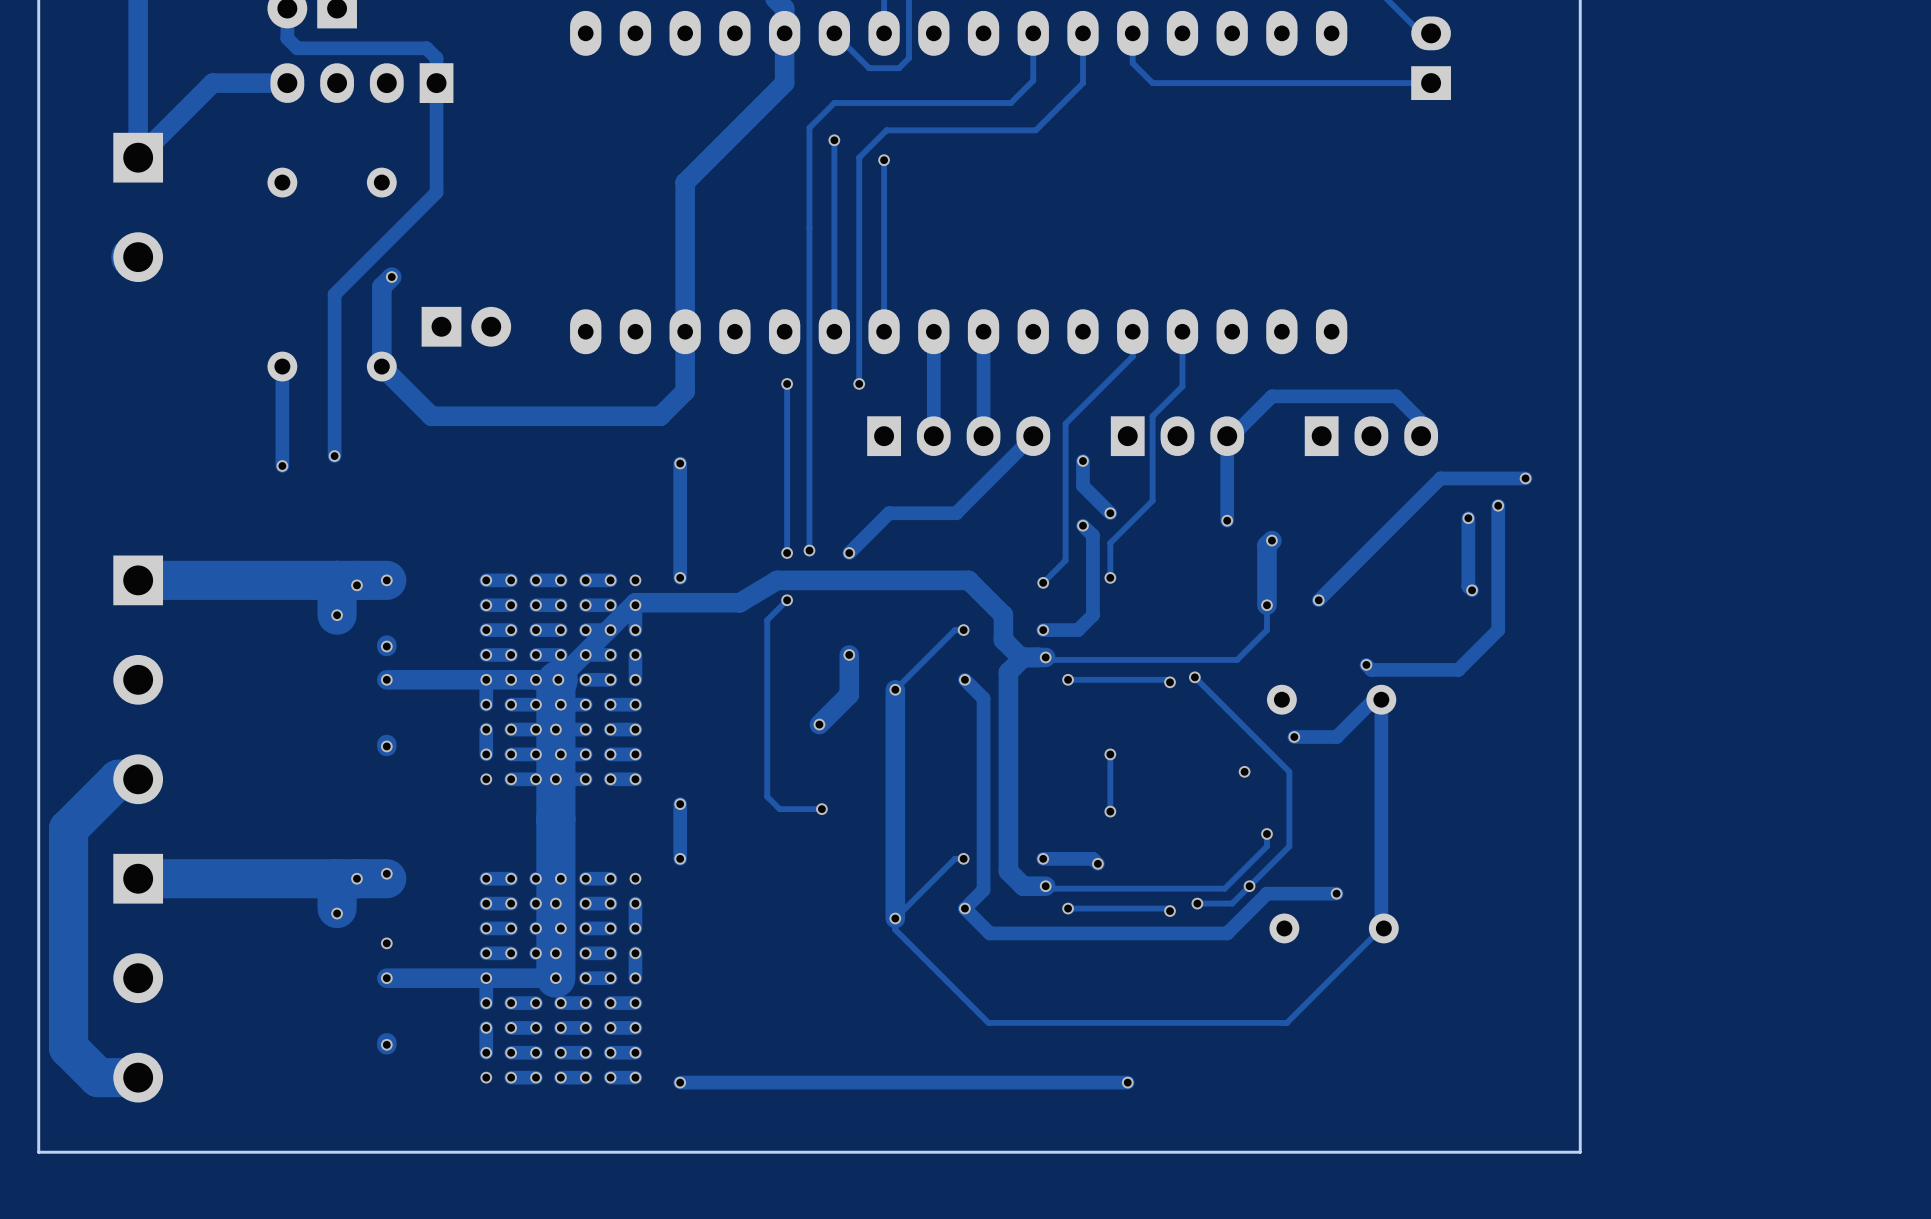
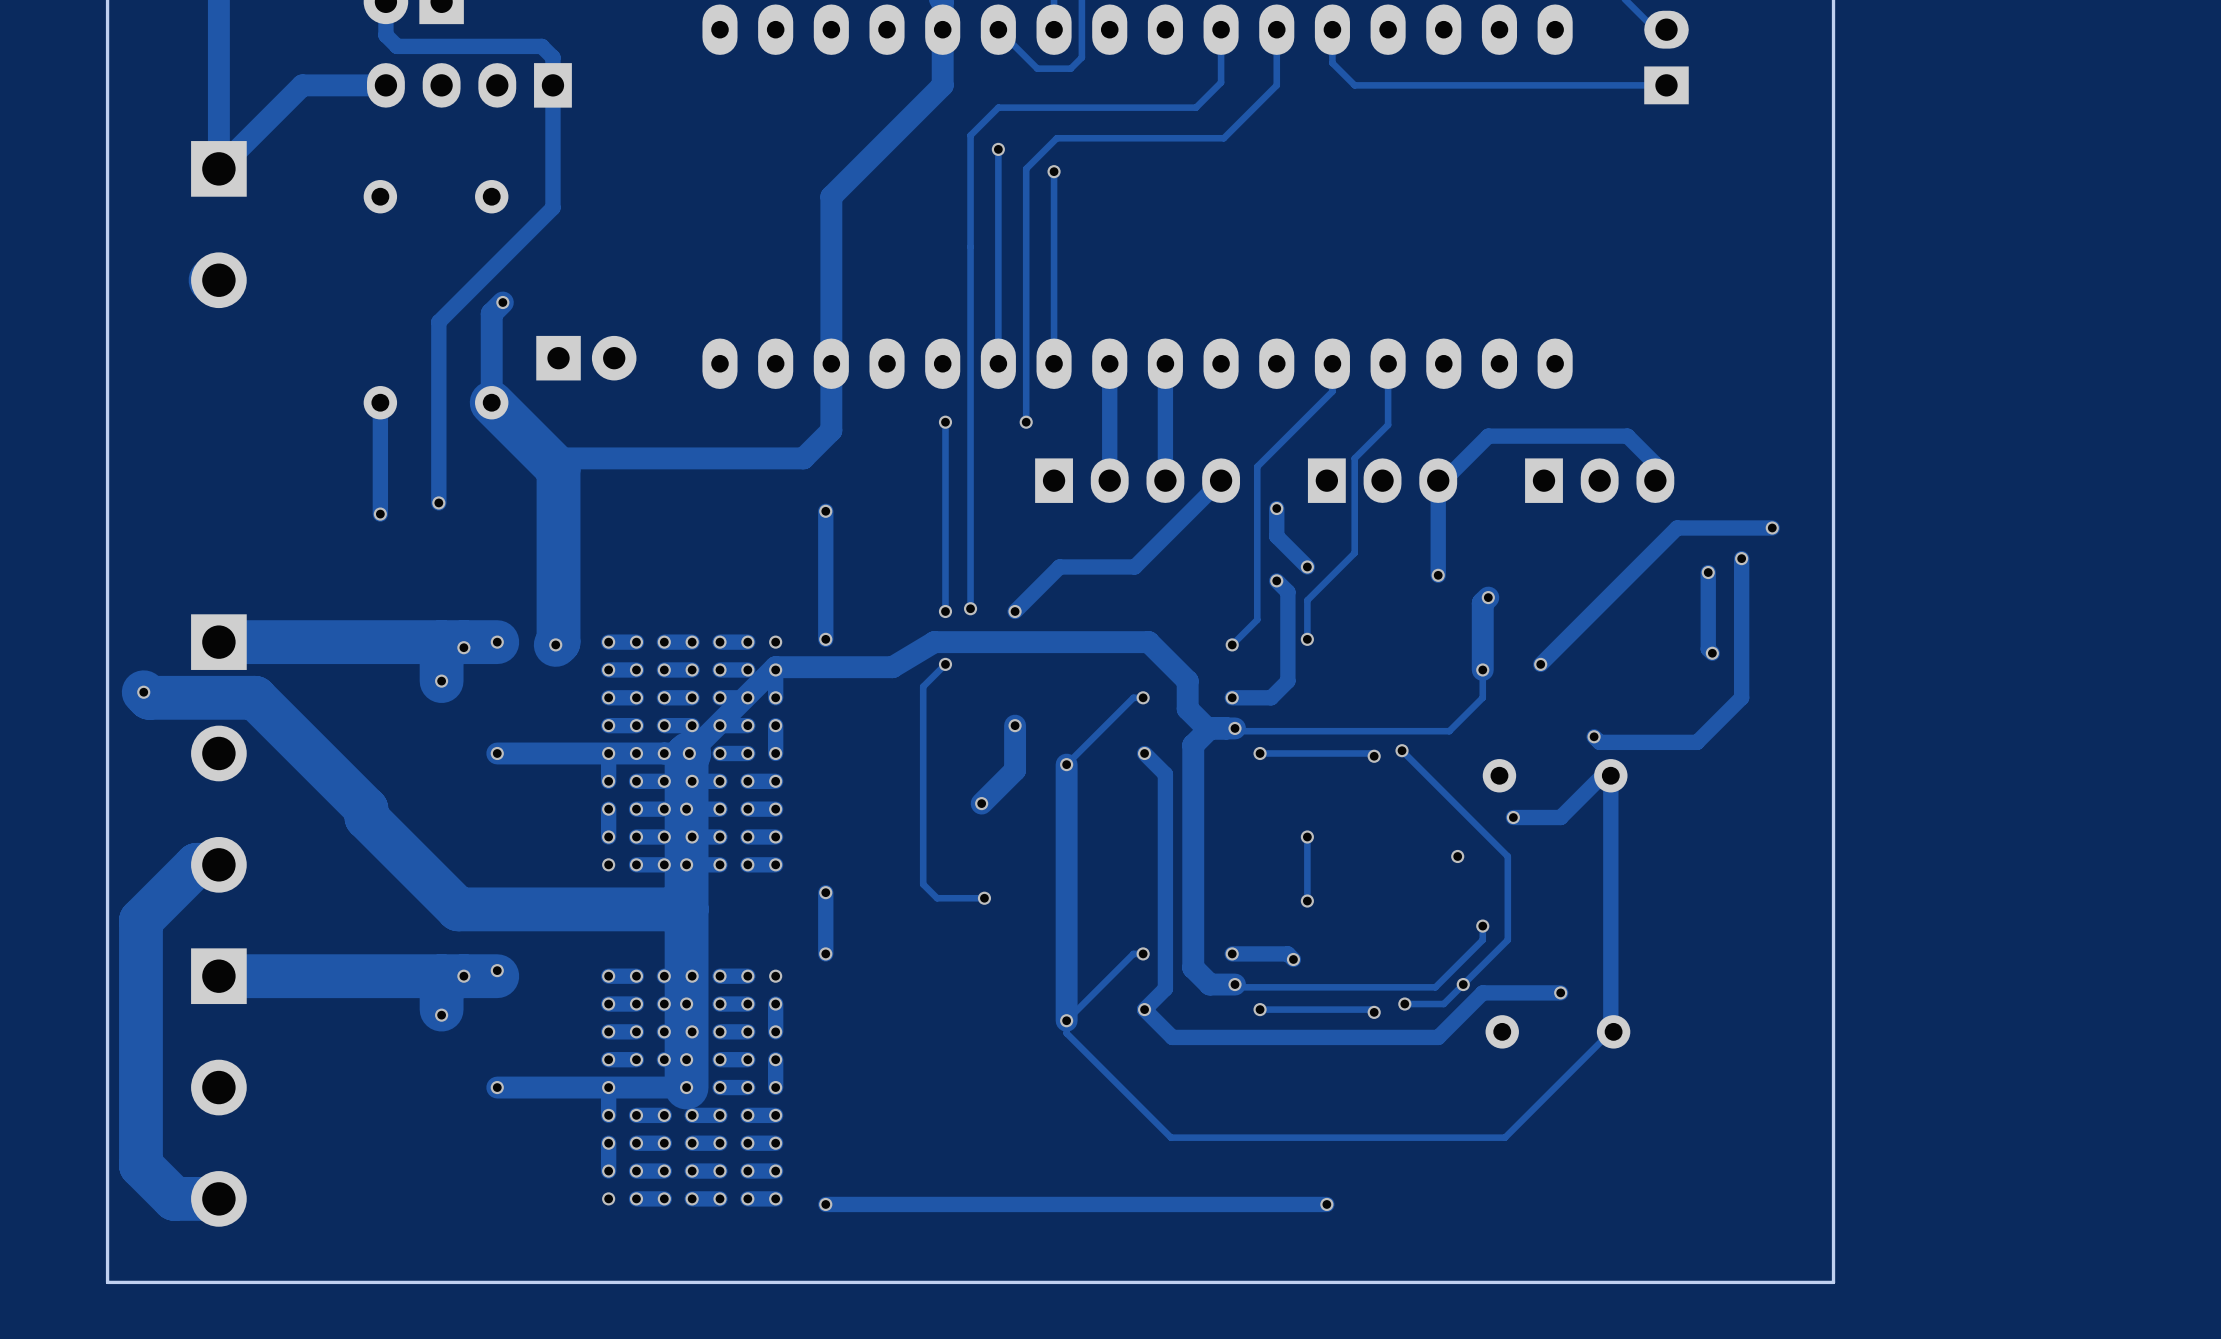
track: none -> (491, 402) (558, 469) (558, 642) (555, 644)
track: none -> (143, 692) (149, 697) (255, 697) (366, 809) (366, 817) (458, 909) (686, 909)
via: none -> (143, 692)
track: (386, 645) (386, 646) -> none
via position: (386, 646) -> (555, 644)
track: (386, 744) (386, 746) -> none
via: (386, 746) -> none
via: (386, 943) -> none
track: (386, 1042) (386, 1044) -> none
via: (386, 1044) -> none

